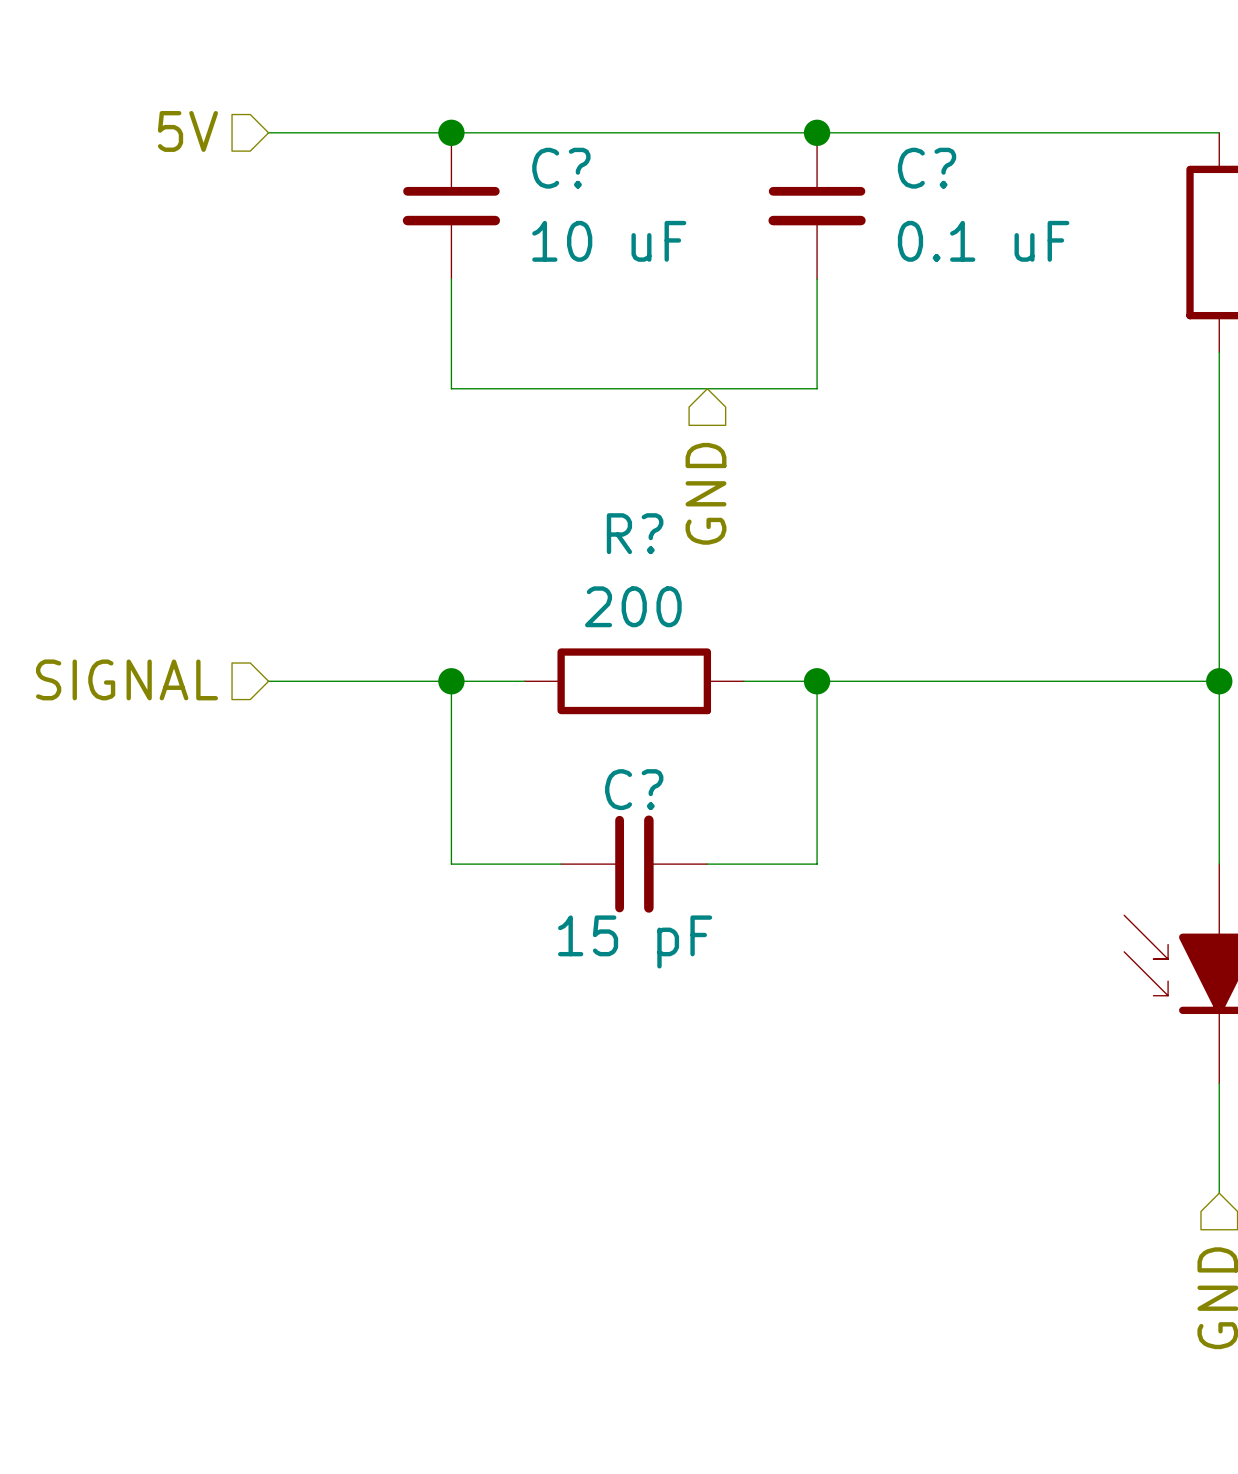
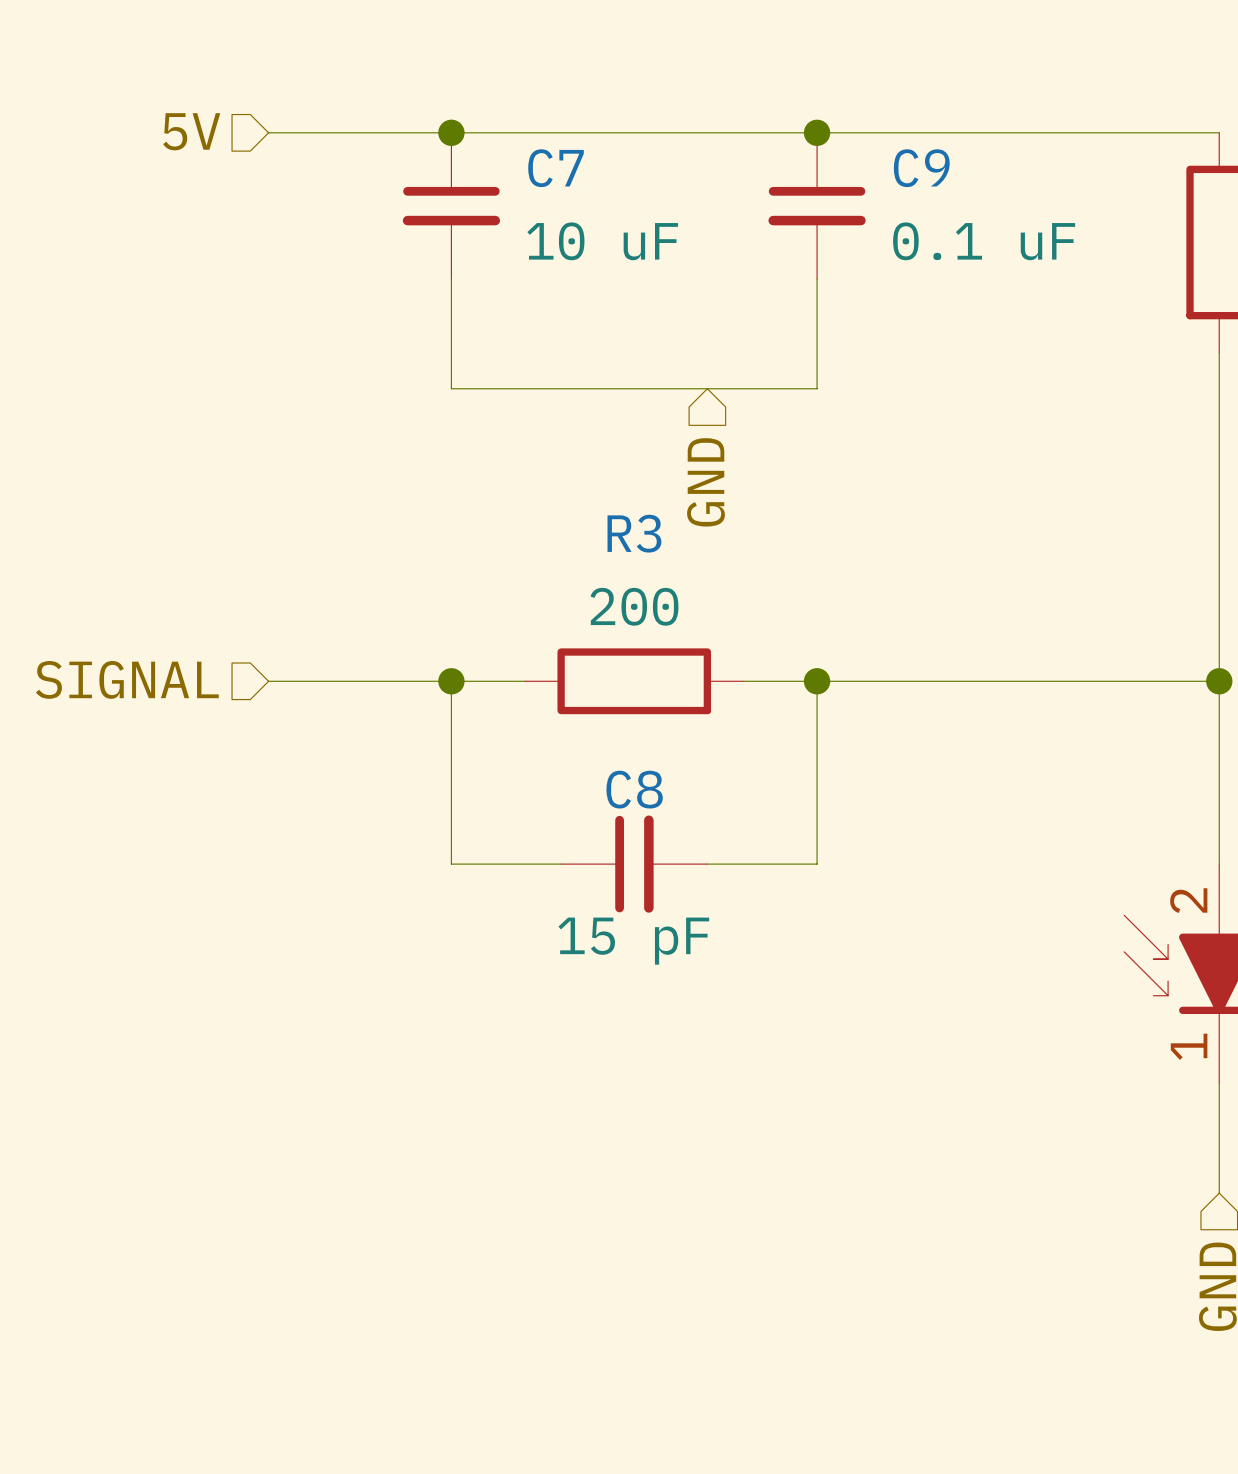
C? name: C? (561, 168) -> C7 (556, 168)
C? name: C? (927, 168) -> C9 (921, 168)
R? name: R? (635, 533) -> R3 (634, 533)
C? name: C? (634, 789) -> C8 (634, 789)
part pin number: none -> 2 (1188, 900)
part pin number: none -> 1 (1189, 1046)

